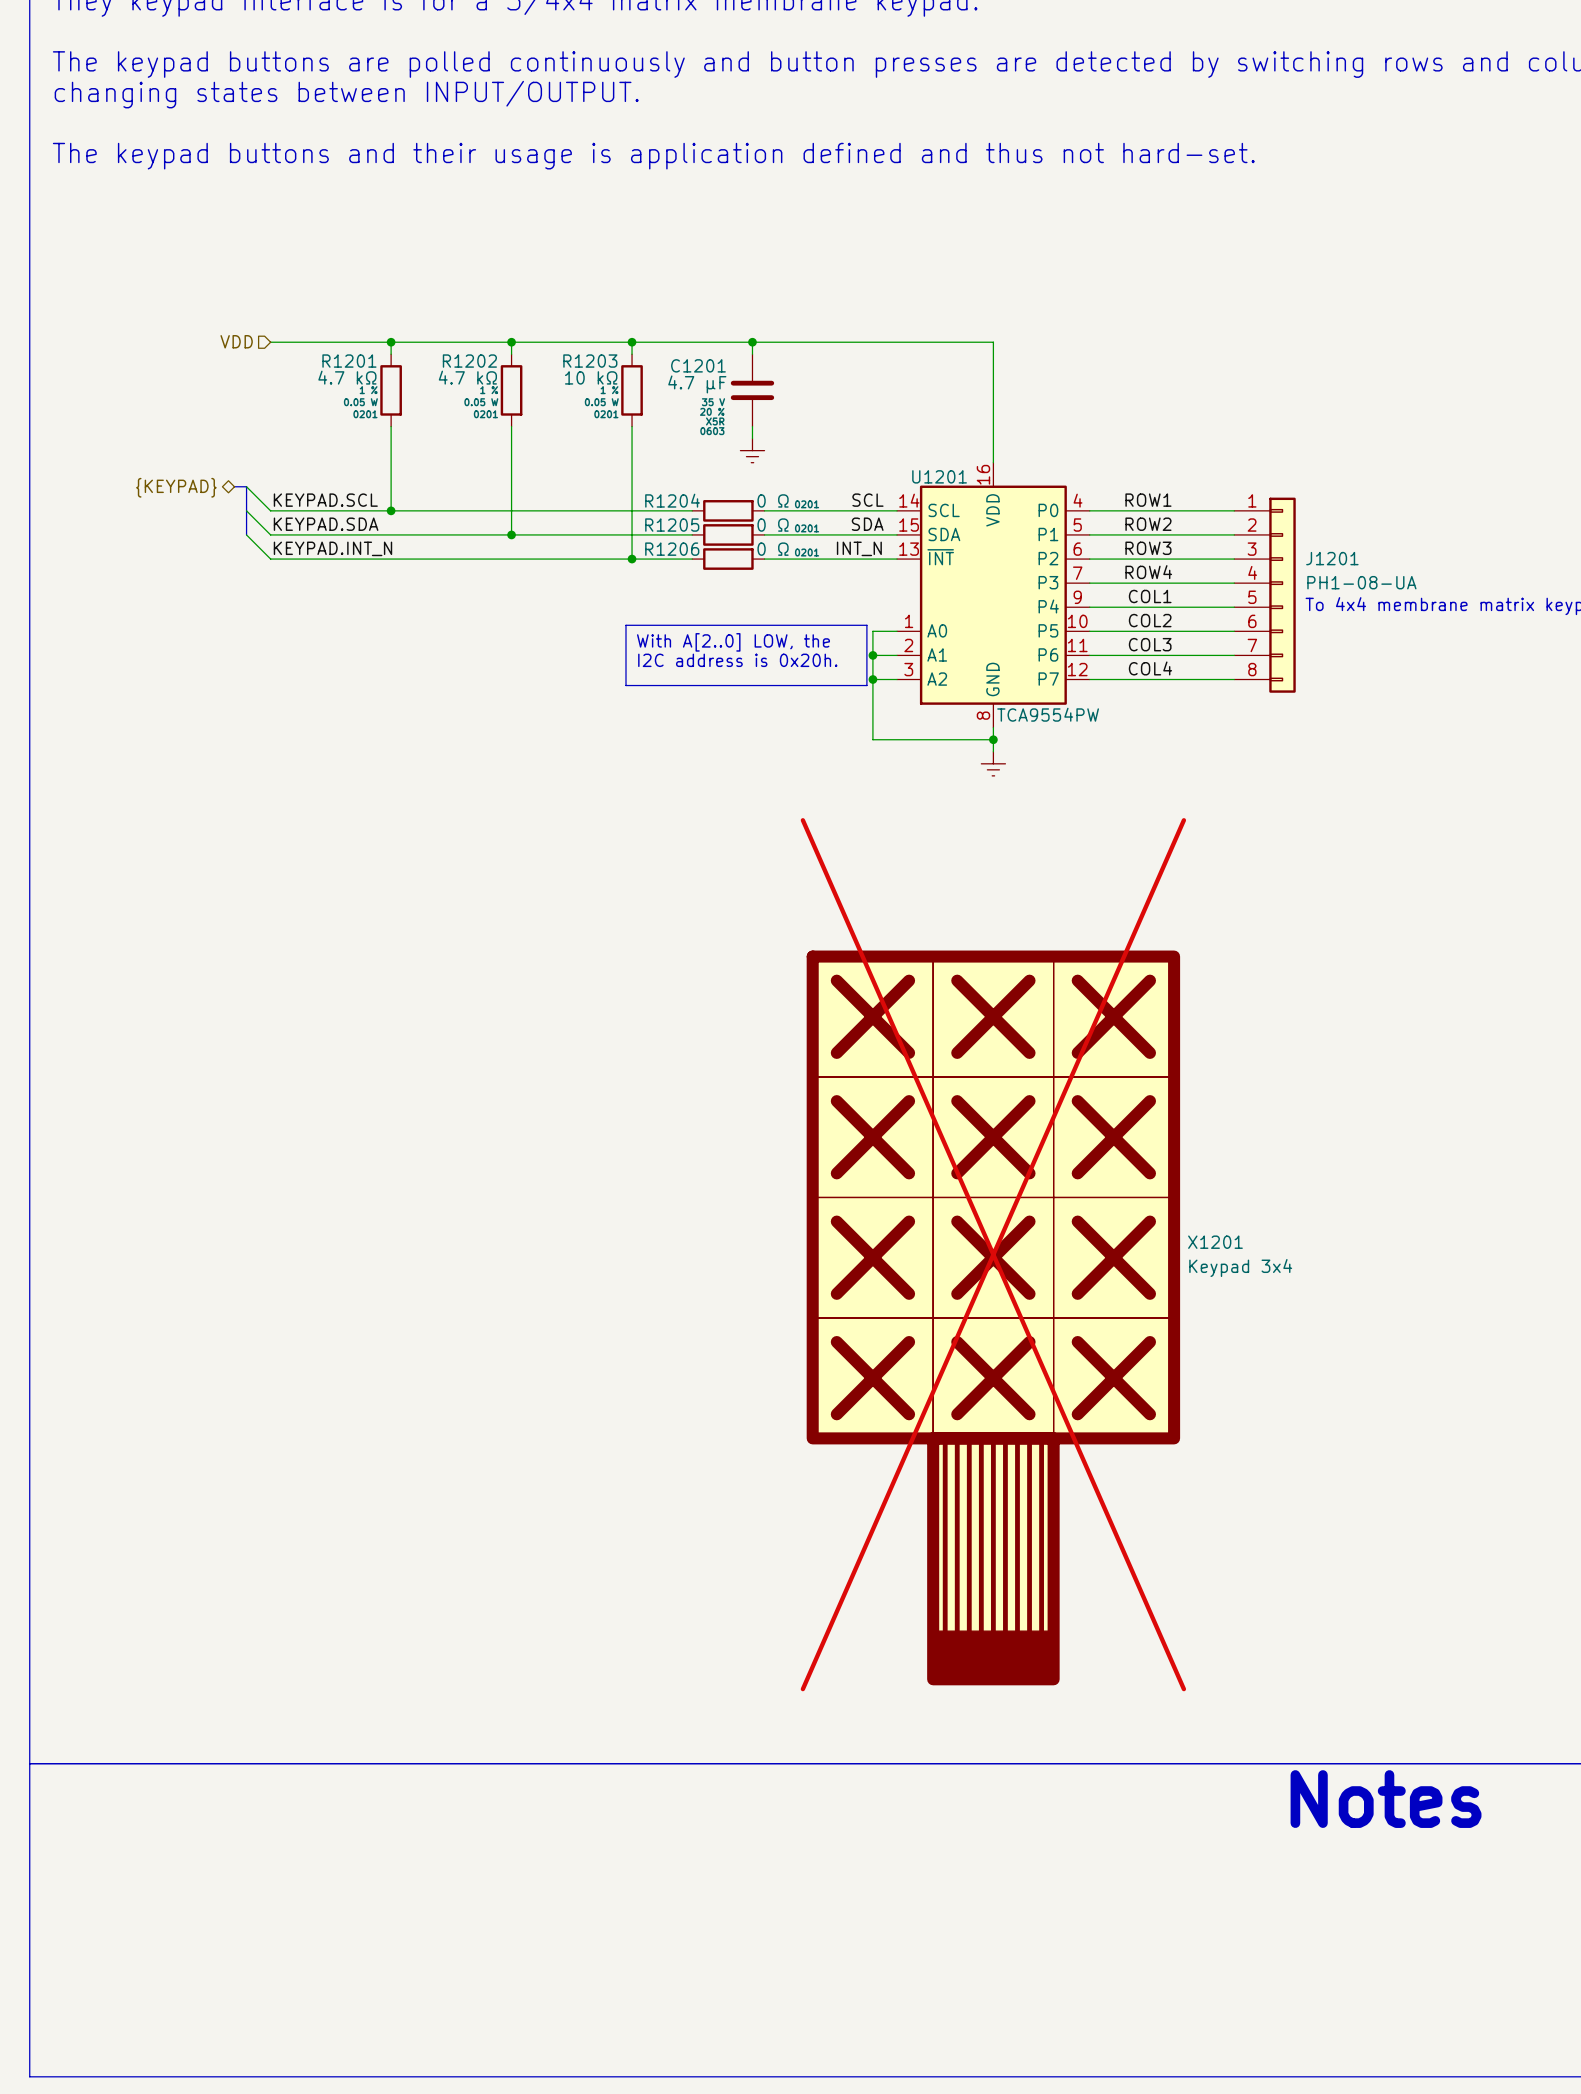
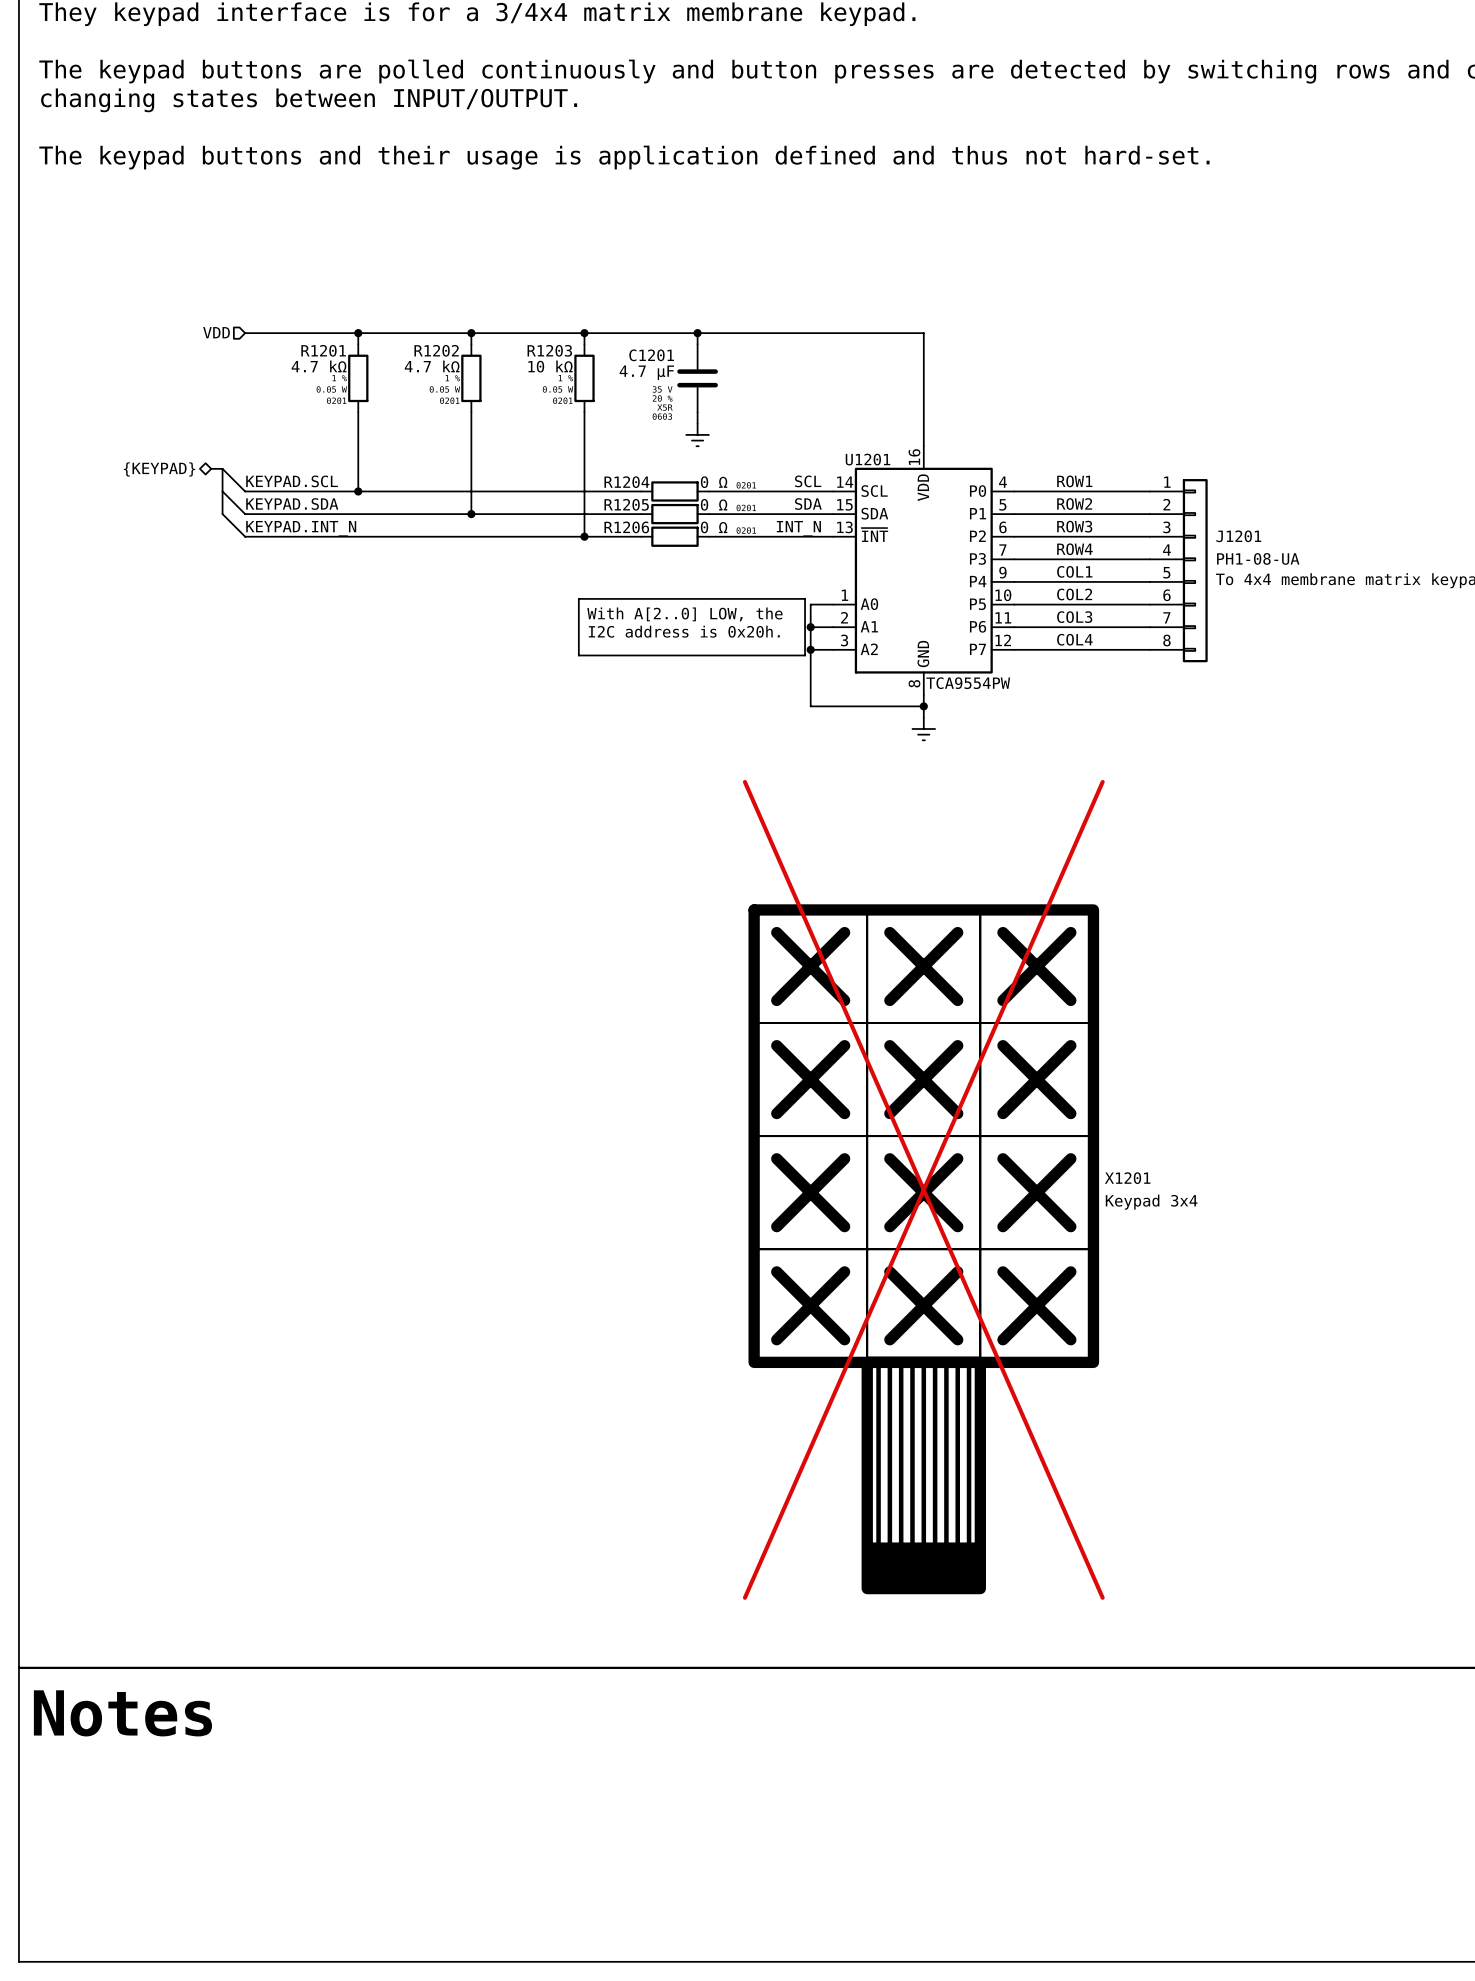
text: Notes (1386, 1799) -> none
text: none -> Notes (122, 1713)

